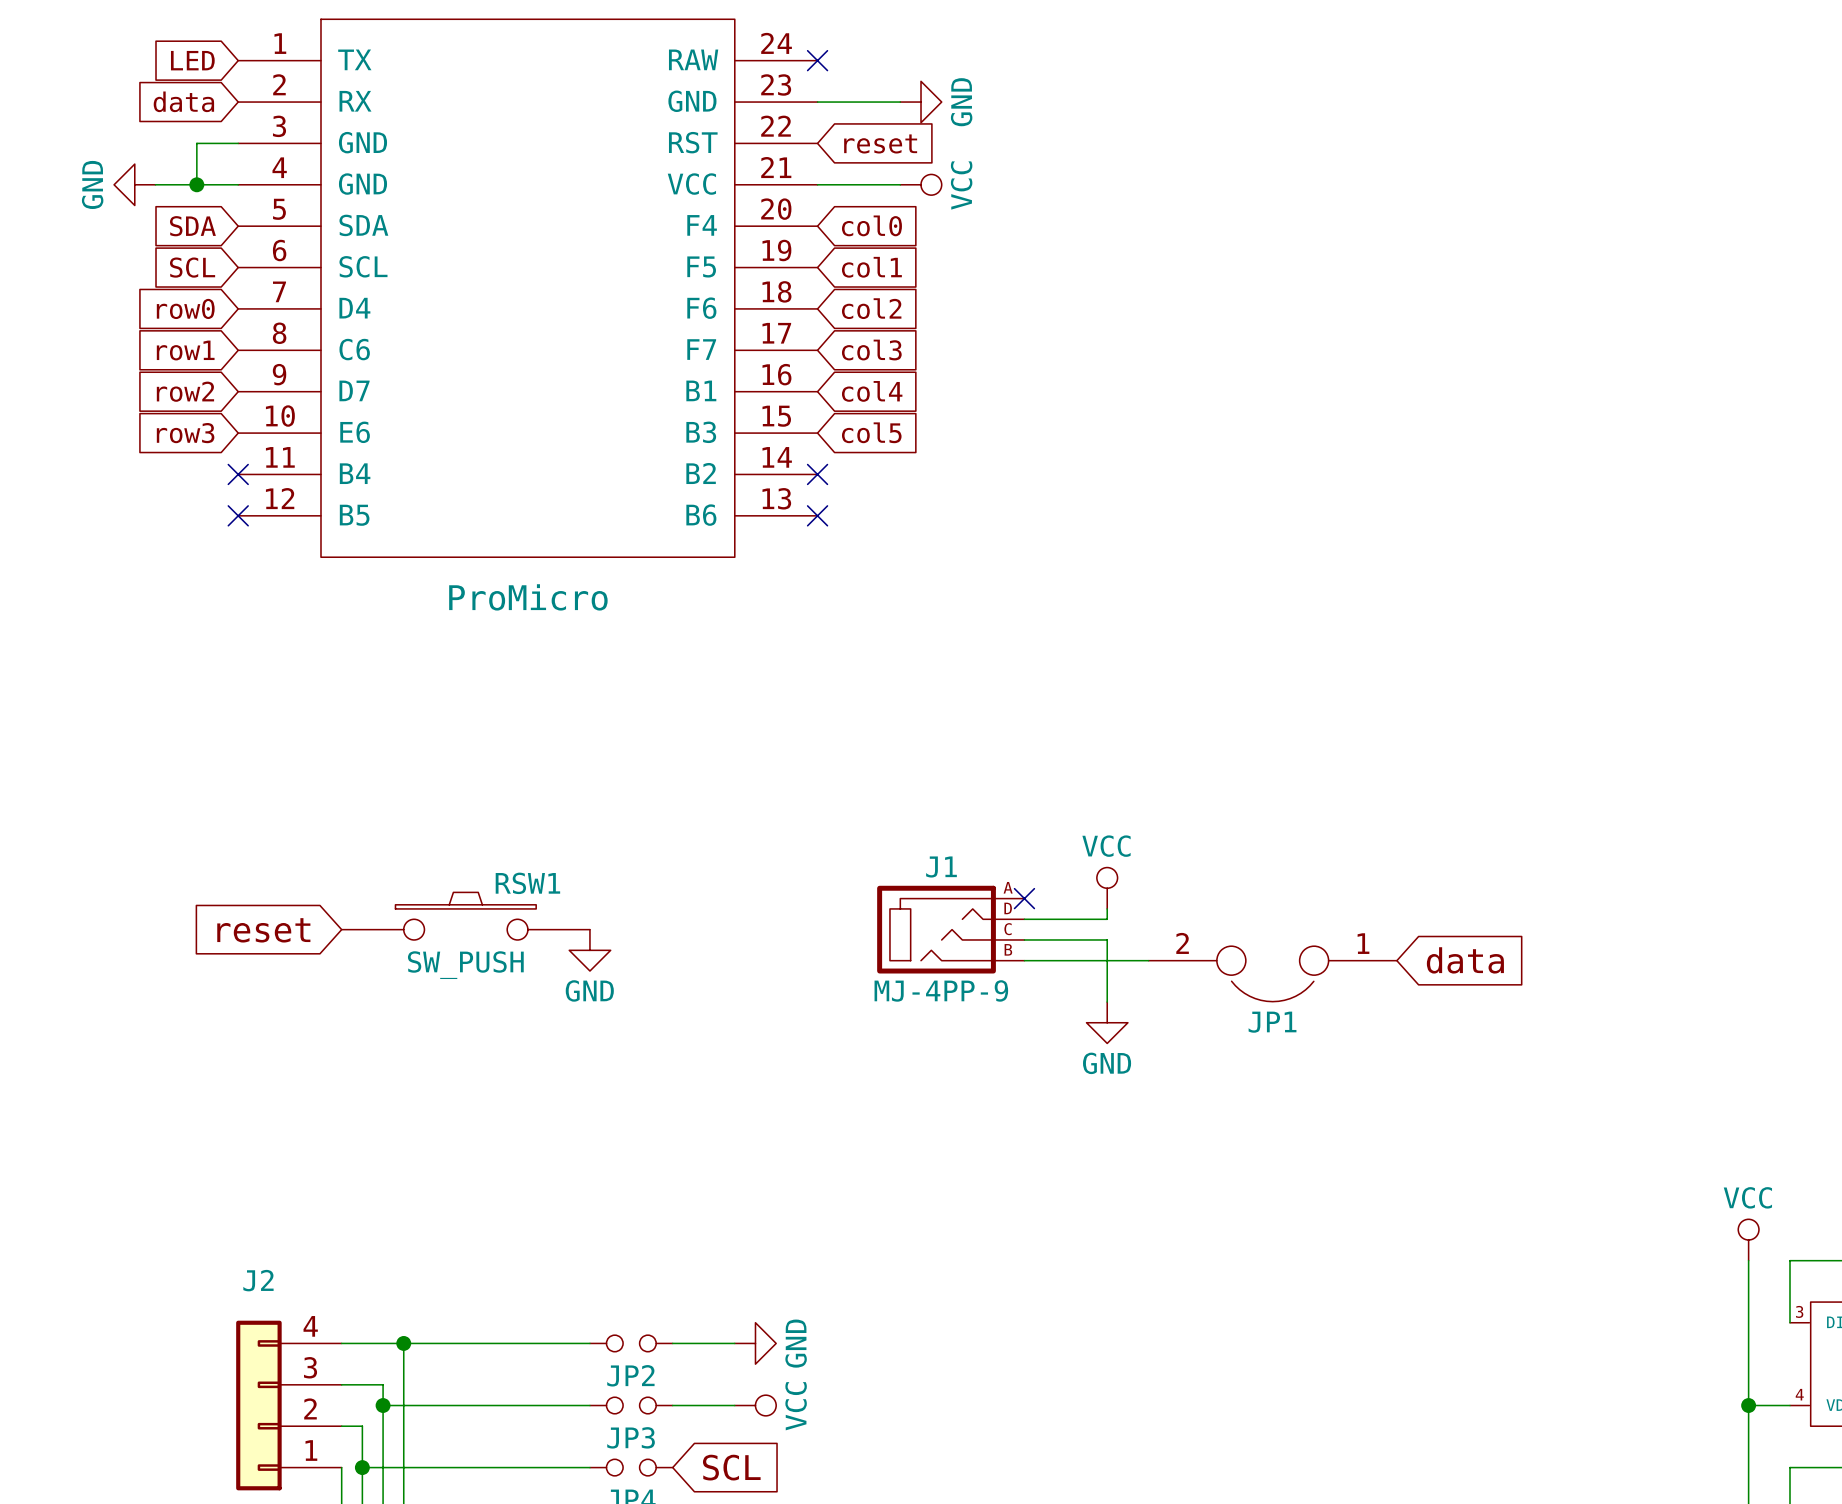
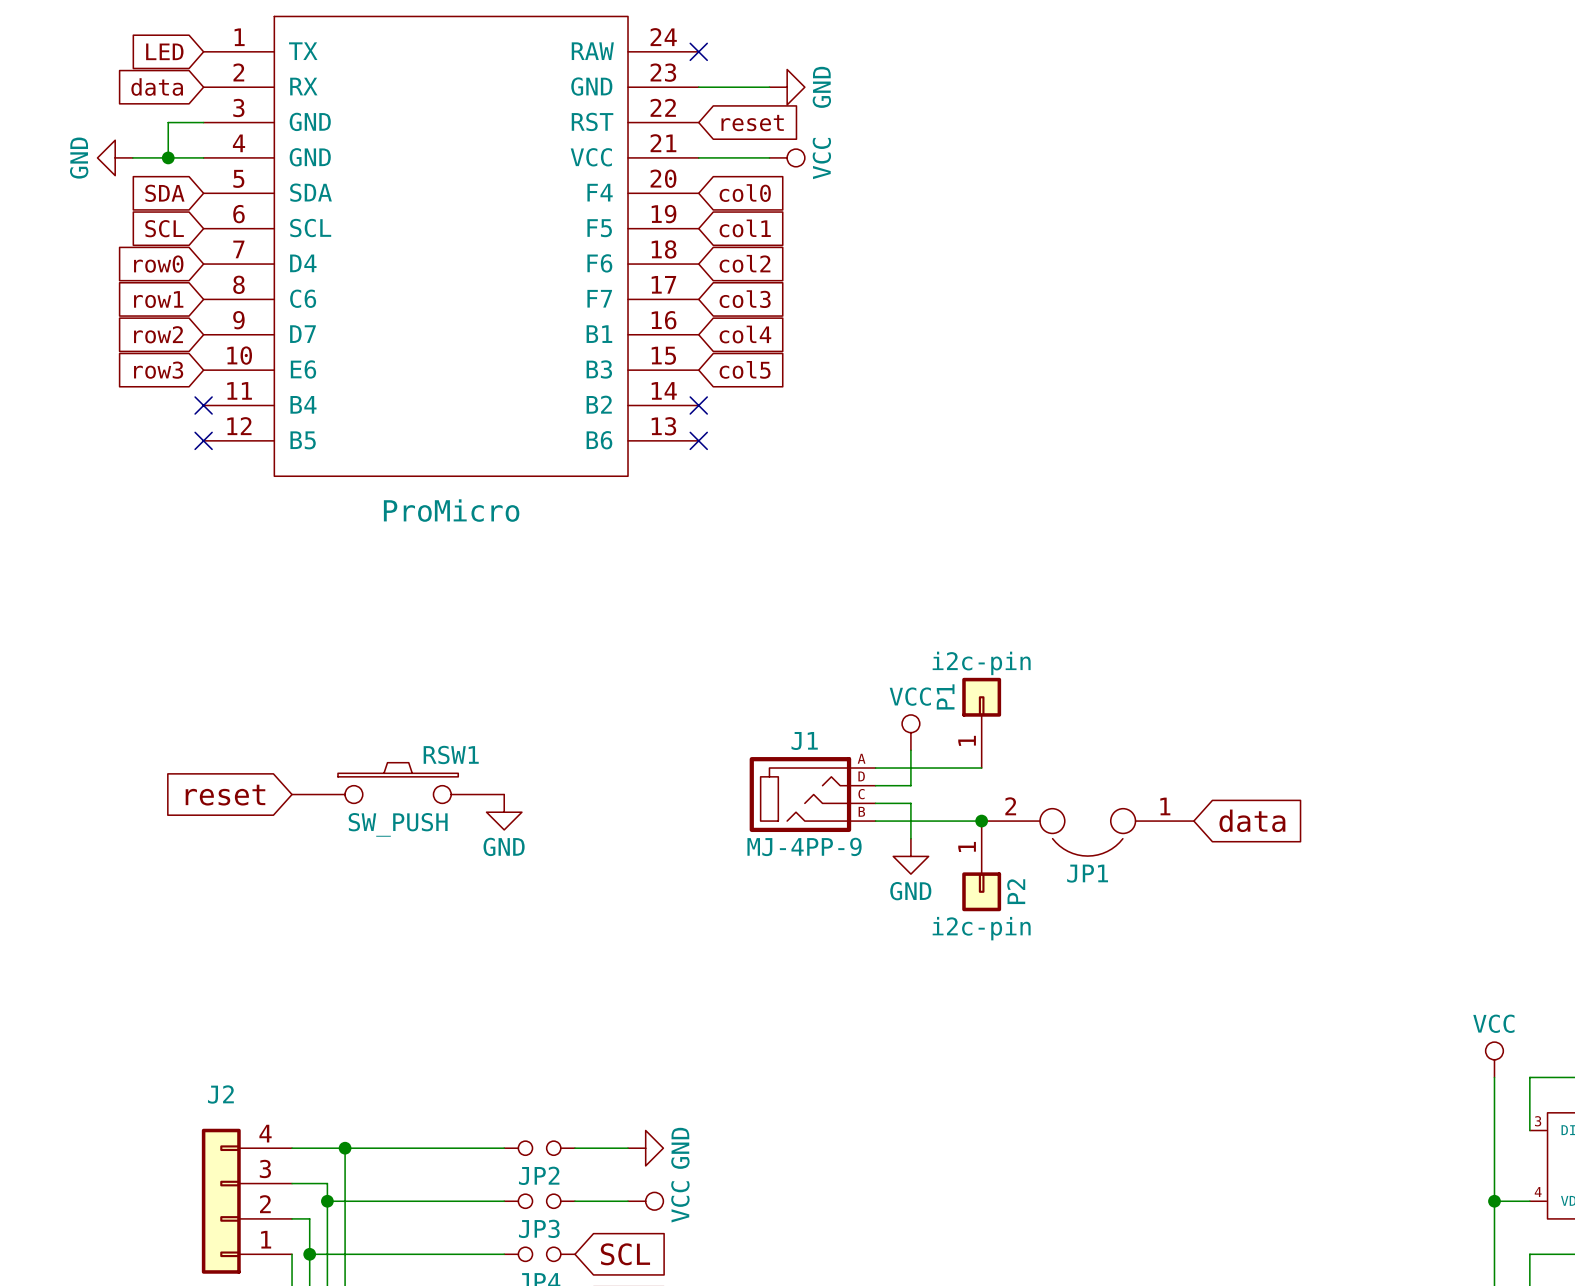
P1: none -> i2c-pin (981, 722)
power symbol position: VCC (1107, 888) -> VCC (910, 732)
wire: none -> (875, 768) (981, 768)
no-connect mark: (1024, 898) -> none
wire: (1107, 908) (1107, 919) (1065, 919) -> (910, 750) (910, 785)
wire: (1065, 939) (1107, 939) (1107, 1002) -> (910, 803) (910, 838)
junction: none -> (981, 821)
P2: none -> i2c-pin (981, 866)
power symbol position: GND (1107, 1022) -> GND (910, 856)

